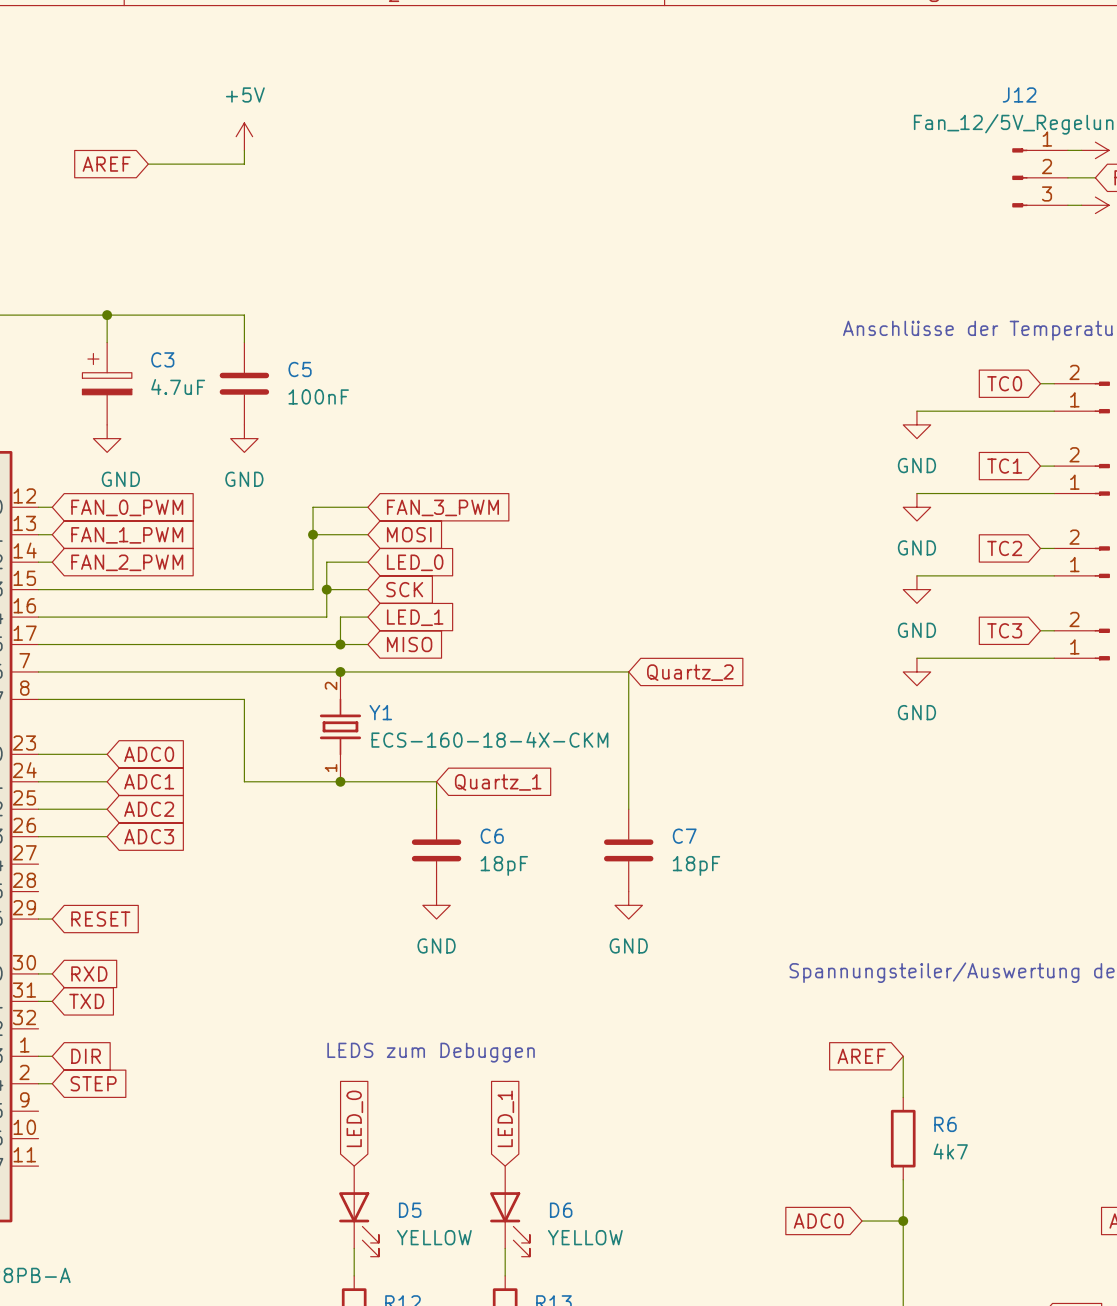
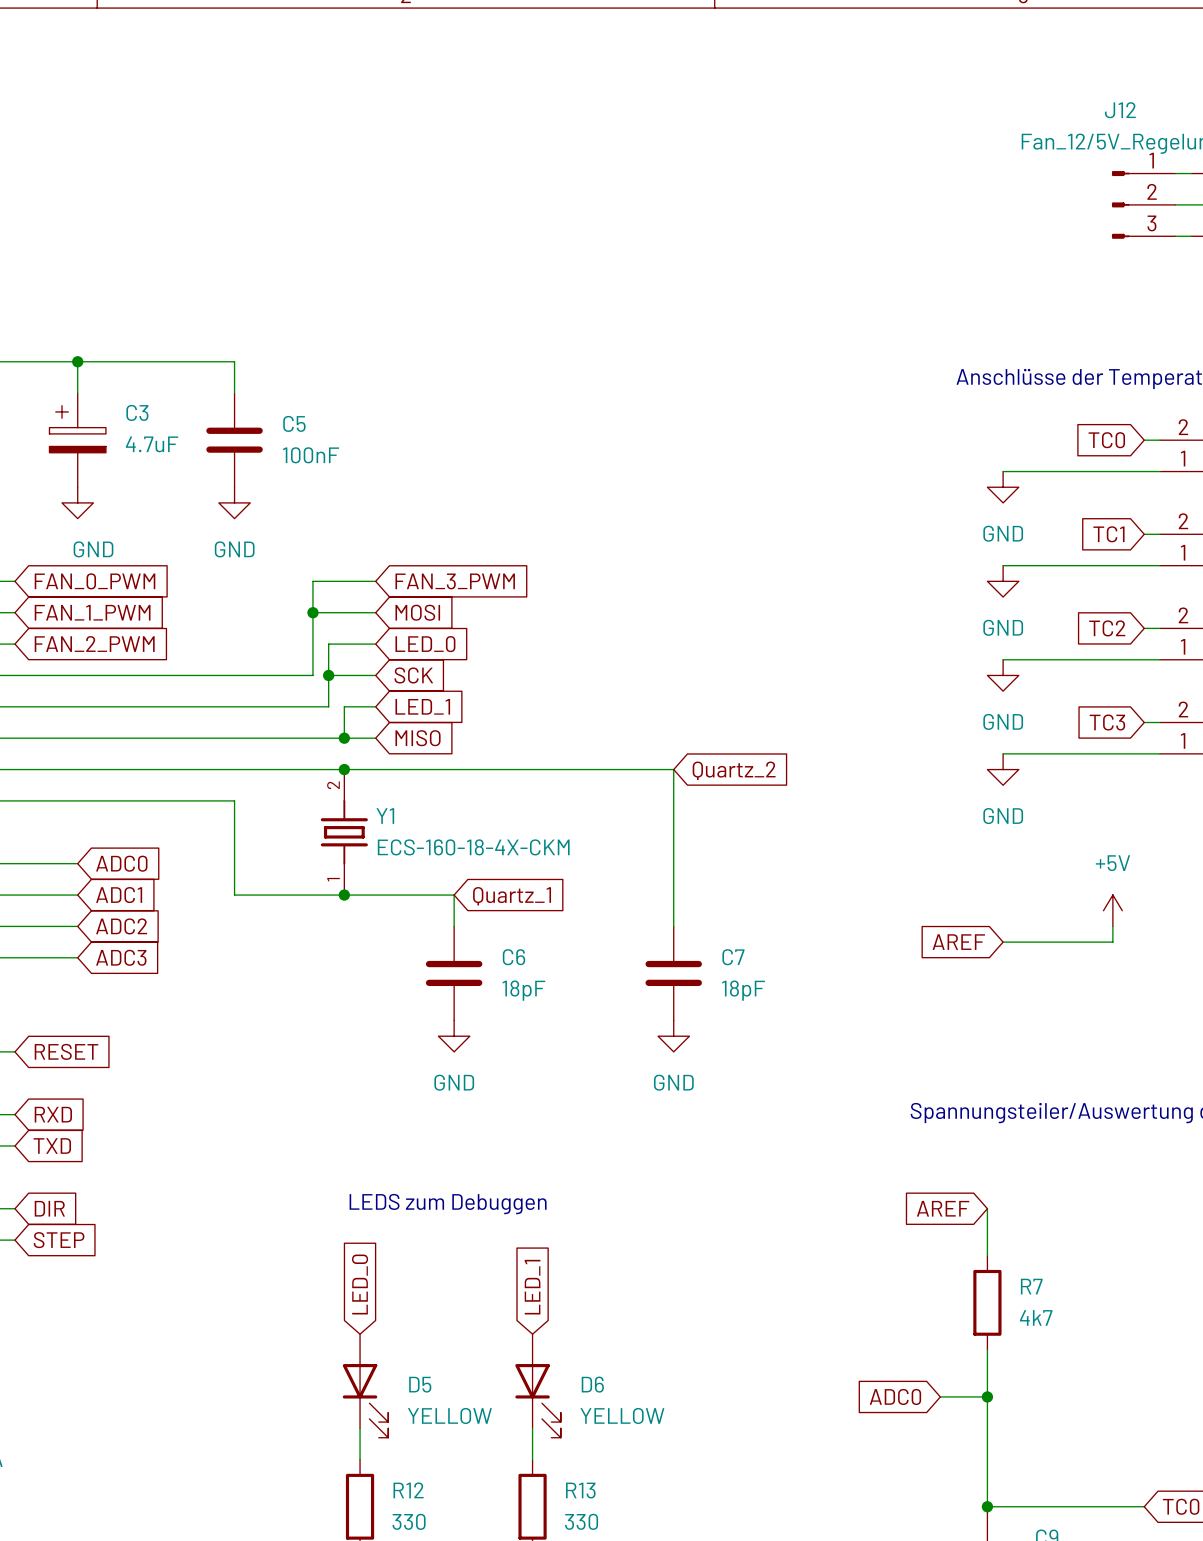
power symbol: +5V (244, 136) -> none
wire: (244, 150) (244, 164) (148, 164) -> none
global label: AREF (106, 164) -> none
power symbol: none -> +5V (1112, 910)
wire: none -> (1112, 926) (1112, 942) (1003, 942)
global label: none -> AREF (958, 942)
R6 name: R6 (945, 1124) -> R7 (1031, 1286)

